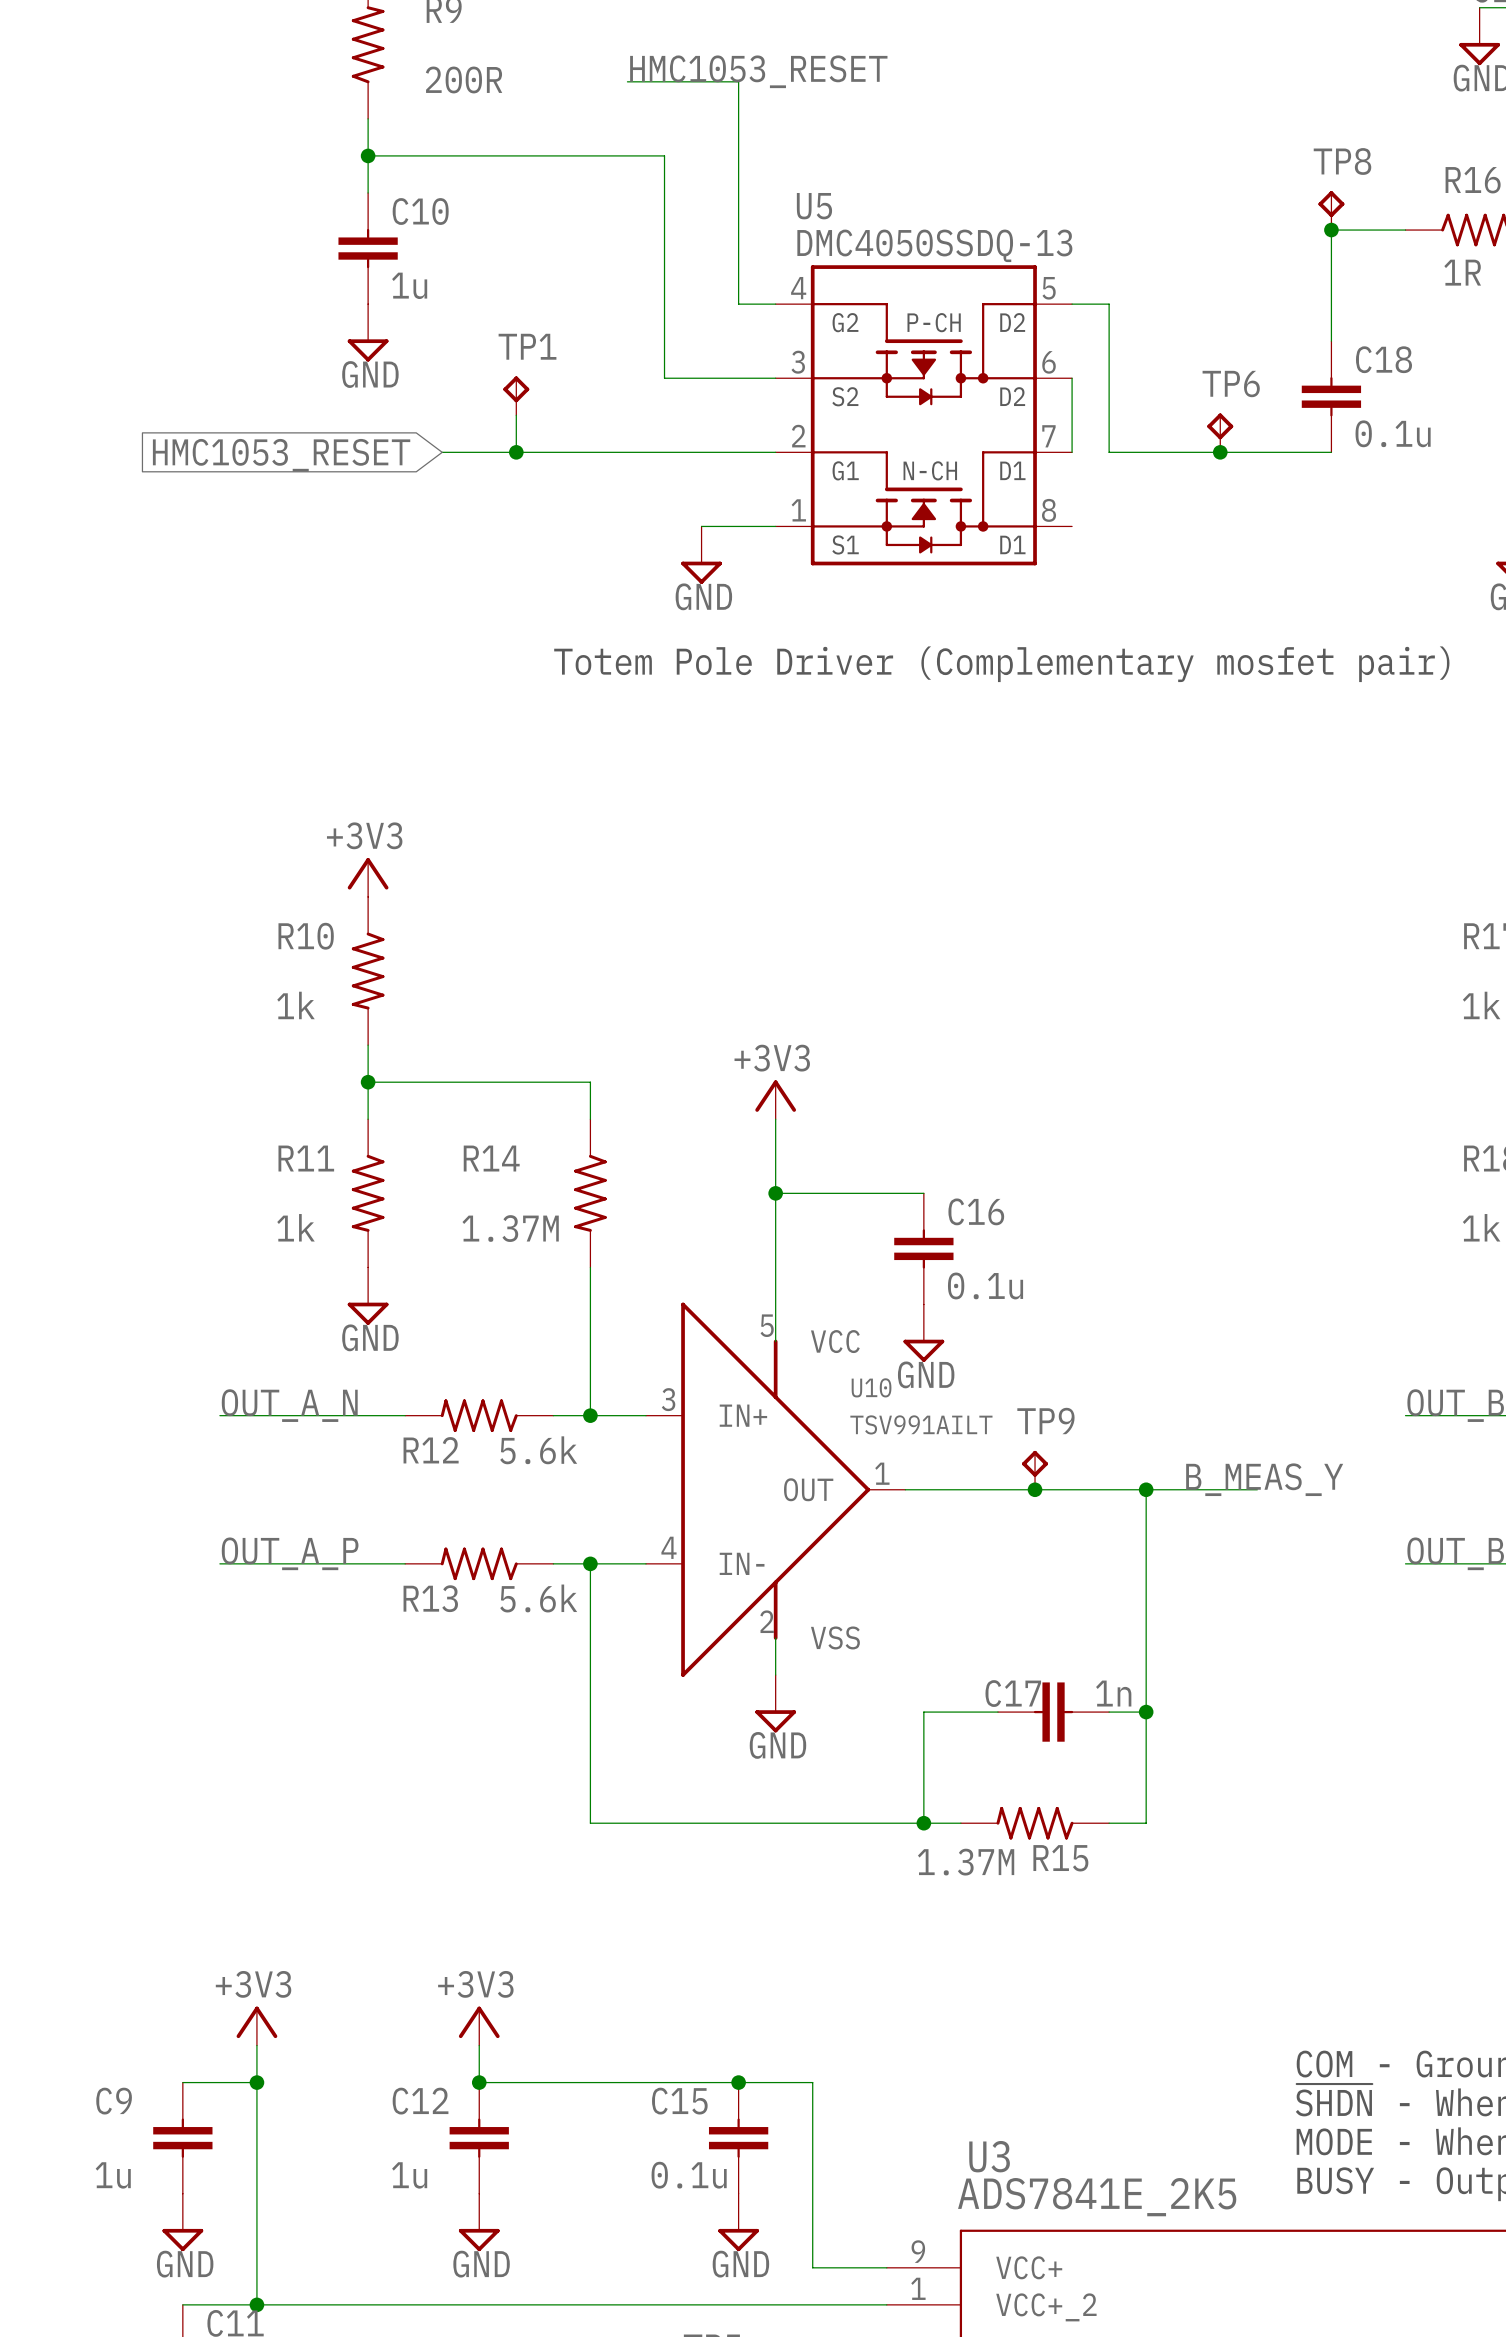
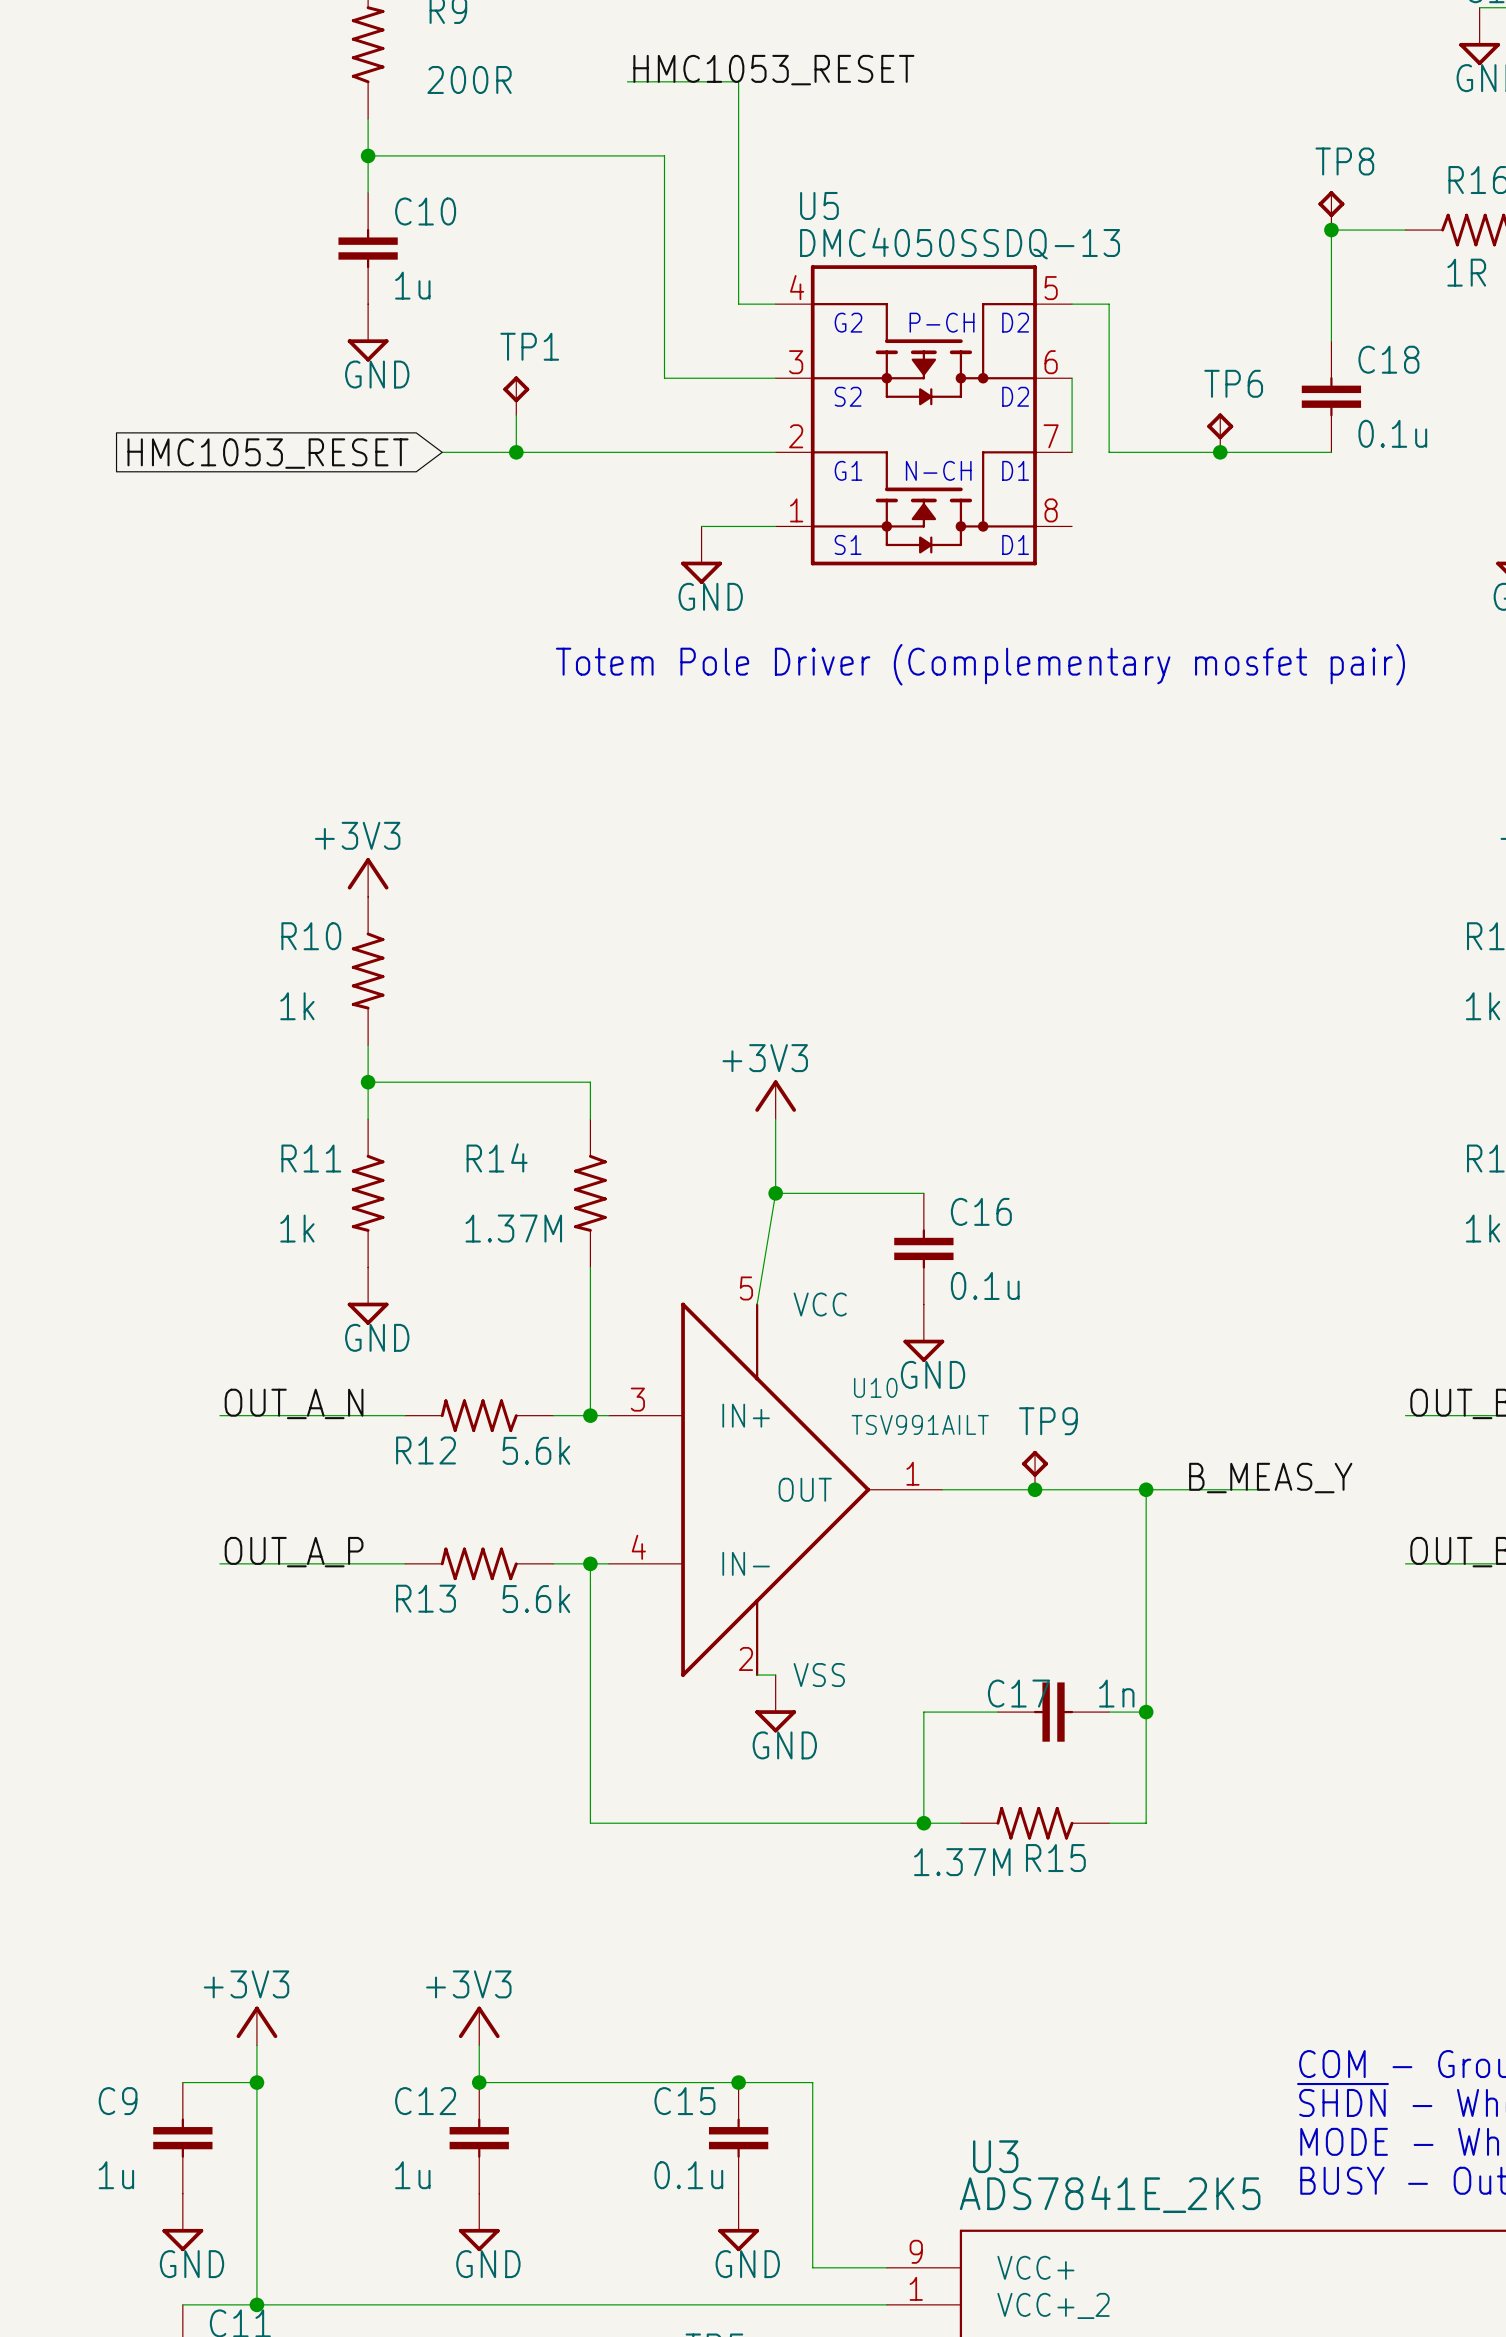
wire: (775, 1193) (775, 1341) -> (775, 1193) (757, 1304)
U10 symbol: [645, 1302, 906, 1677] -> [608, 1302, 943, 1677]
wire: (775, 1637) (775, 1675) -> (757, 1675) (775, 1675)

